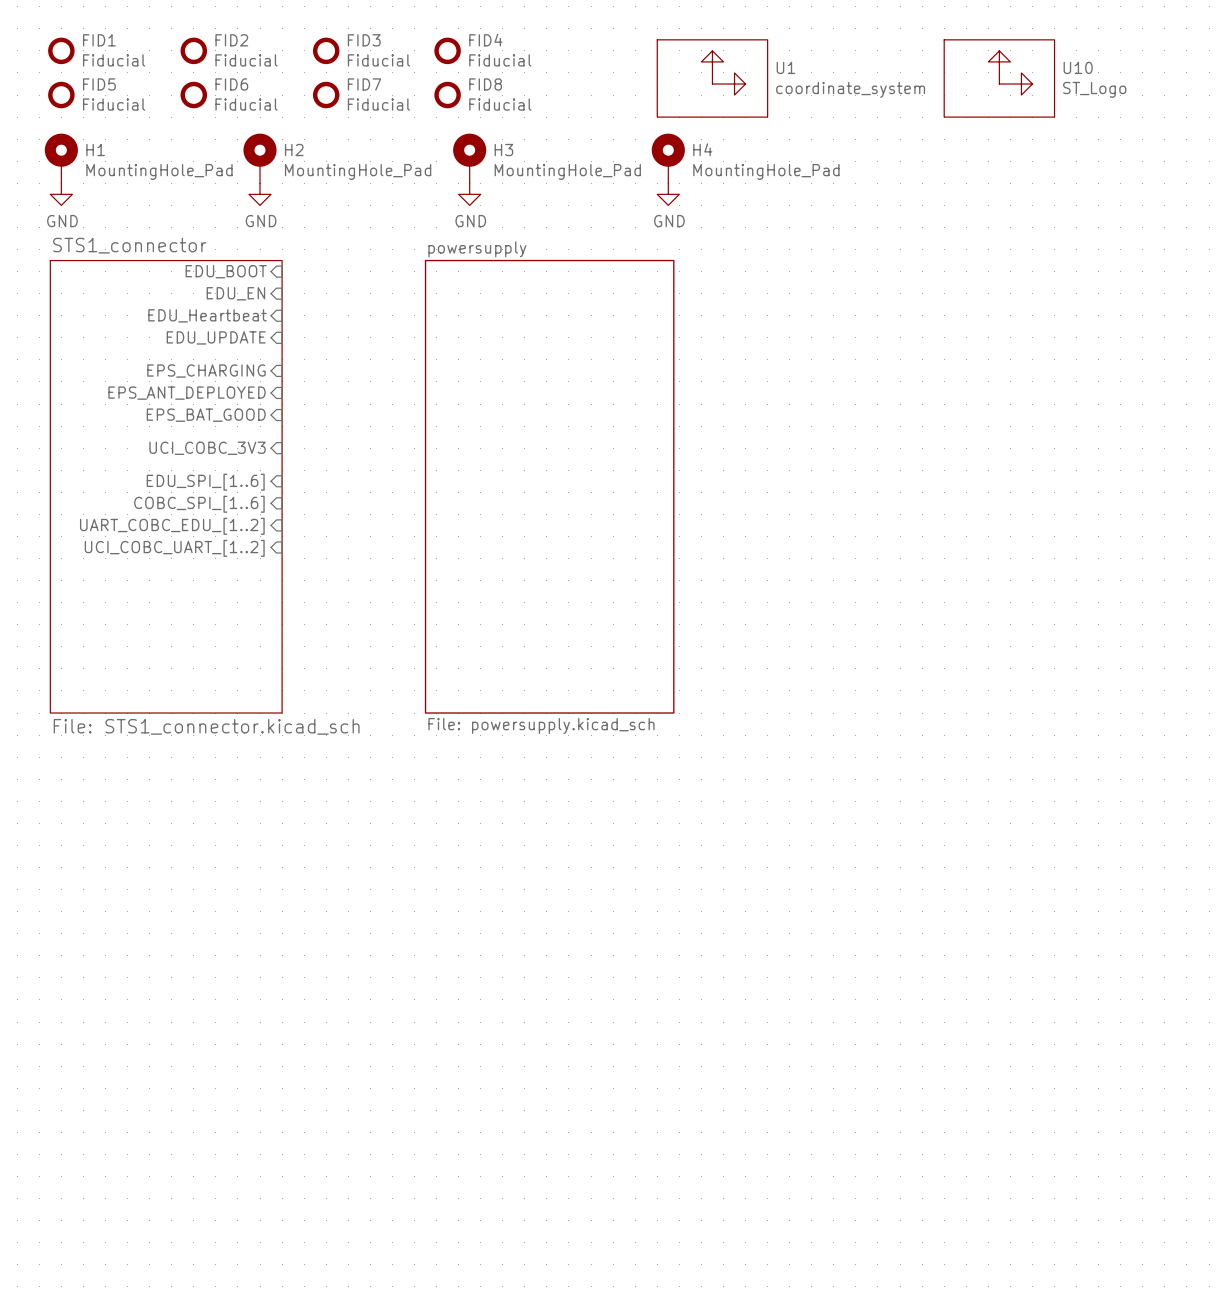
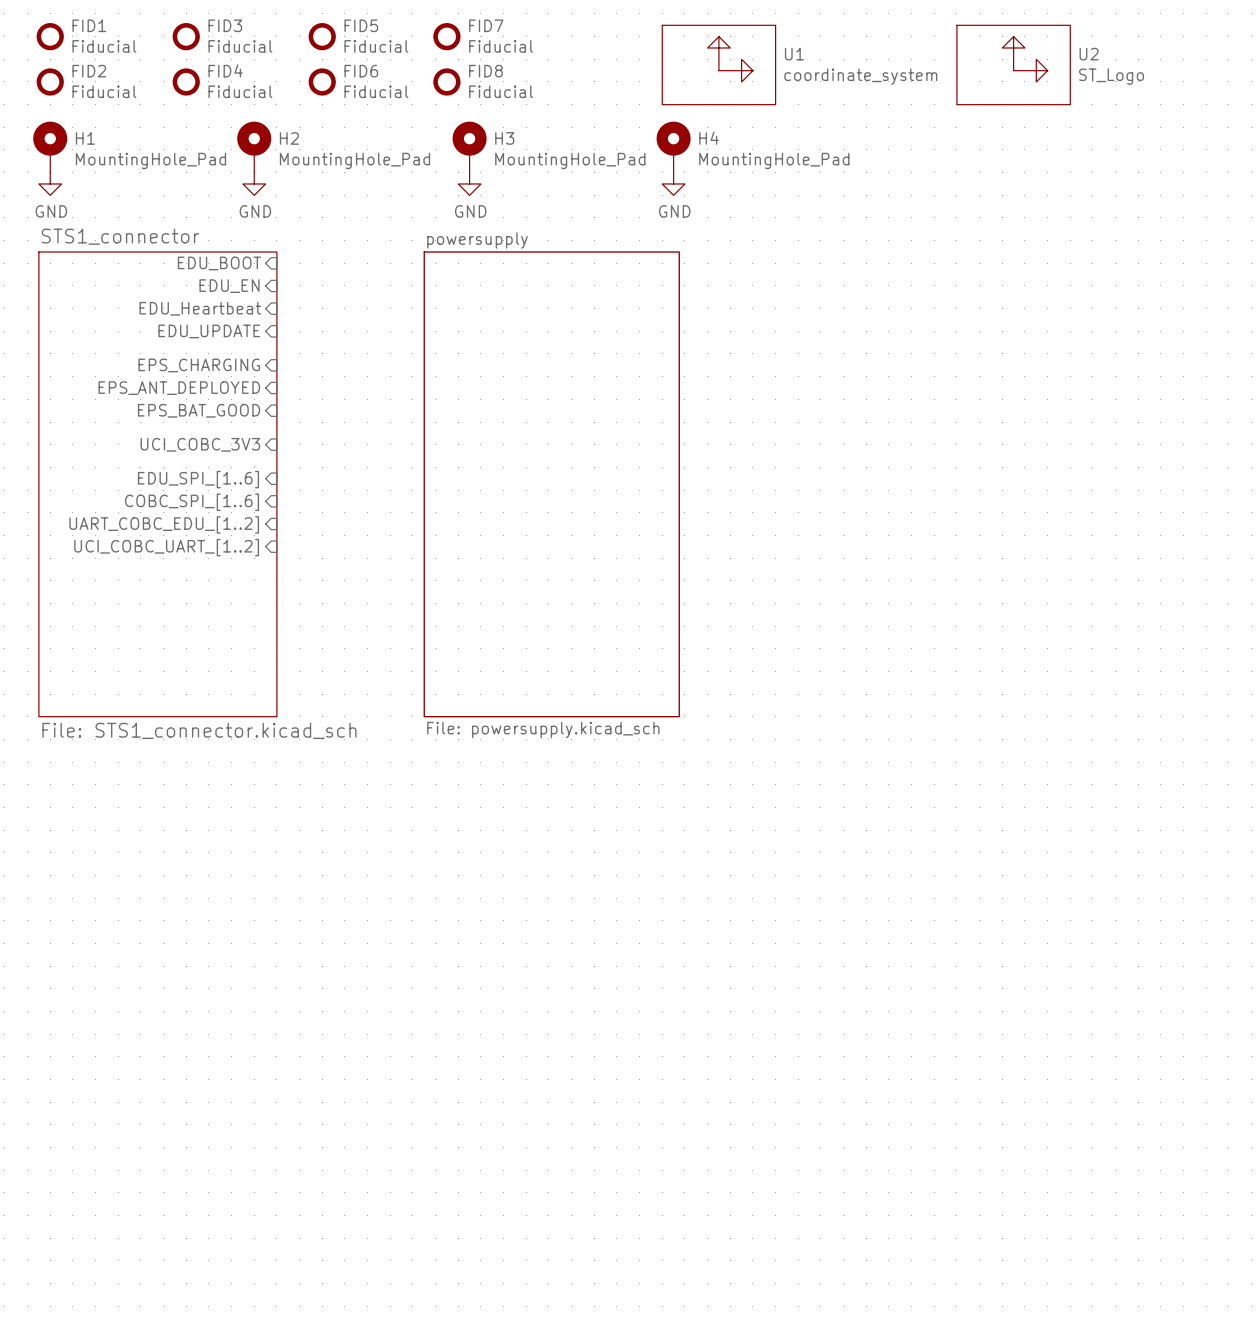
FID2 name: FID2 (231, 40) -> FID3 (225, 25)
FID3 name: FID3 (364, 40) -> FID5 (361, 25)
FID4 name: FID4 (485, 40) -> FID7 (486, 25)
U10 name: U10 (1078, 67) -> U2 (1089, 54)
FID5 name: FID5 (99, 84) -> FID2 (89, 71)
FID6 name: FID6 (231, 84) -> FID4 (225, 70)
FID7 name: FID7 (364, 84) -> FID6 (361, 71)

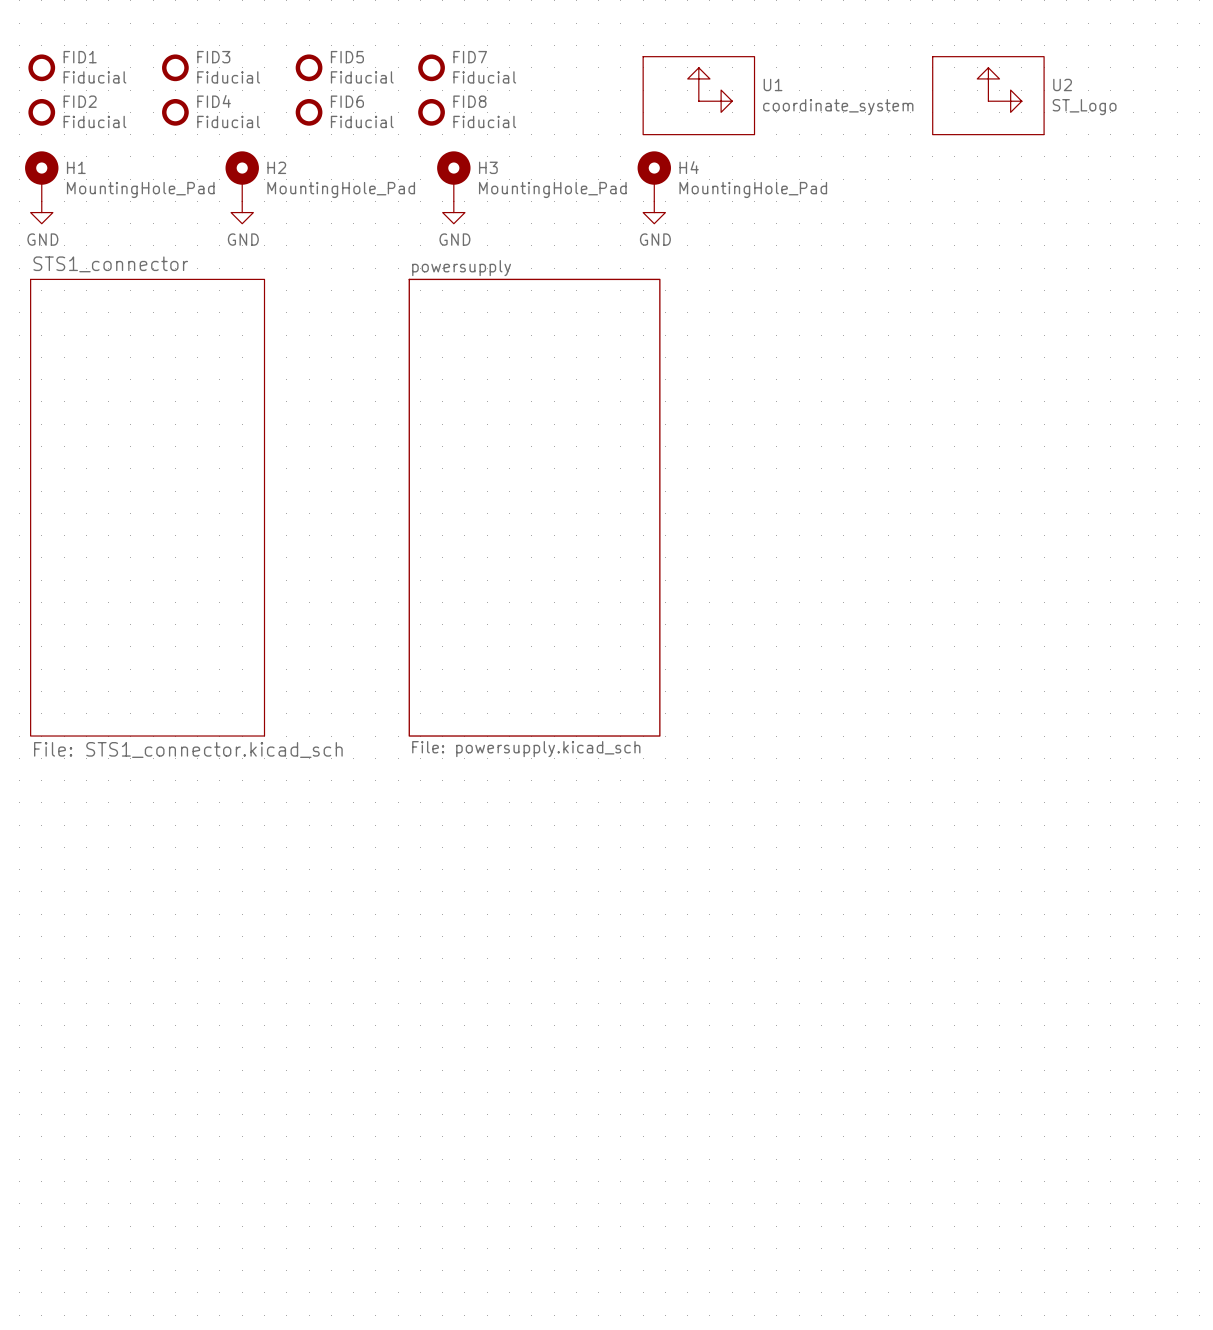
sheet pin: EDU_BOOT (219, 263) -> none
sheet pin: EDU_EN (229, 286) -> none
sheet pin: EDU_Heartbeat (200, 308) -> none
sheet pin: EDU_UPDATE (209, 331) -> none
sheet pin: EPS_CHARGING (199, 365) -> none
sheet pin: EPS_ANT_DEPLOYED (179, 388) -> none
sheet pin: EPS_BAT_GOOD (199, 410) -> none
sheet pin: UCI_COBC_3V3 (200, 444) -> none
sheet pin: EDU_SPI_[1..6] (198, 479) -> none
sheet pin: COBC_SPI_[1..6] (192, 502) -> none
sheet pin: UART_COBC_EDU_[1..2] (164, 524) -> none
sheet pin: UCI_COBC_UART_[1..2] (166, 547) -> none

